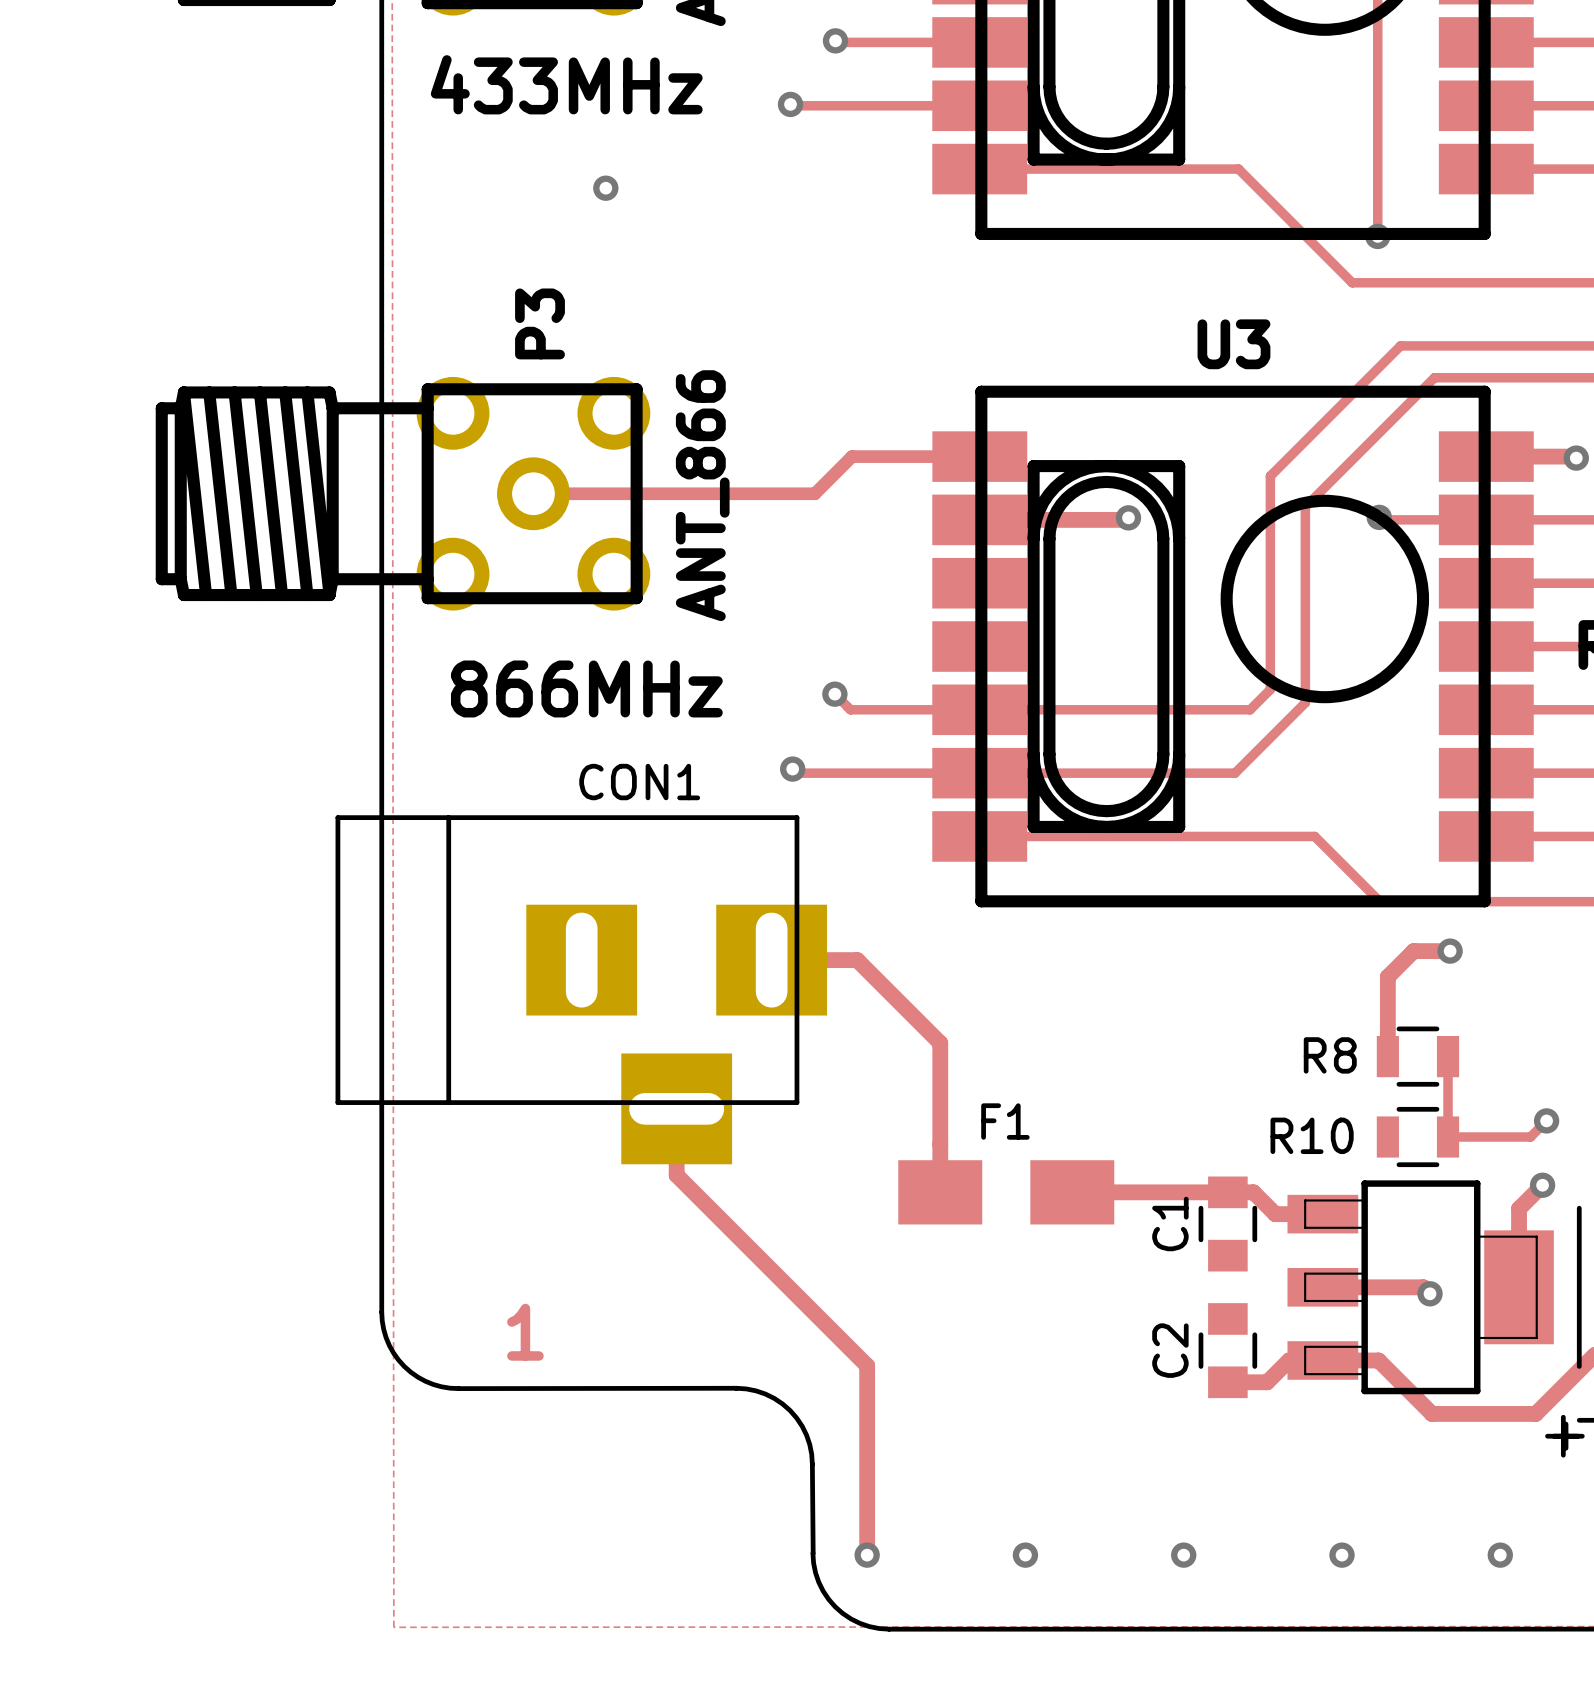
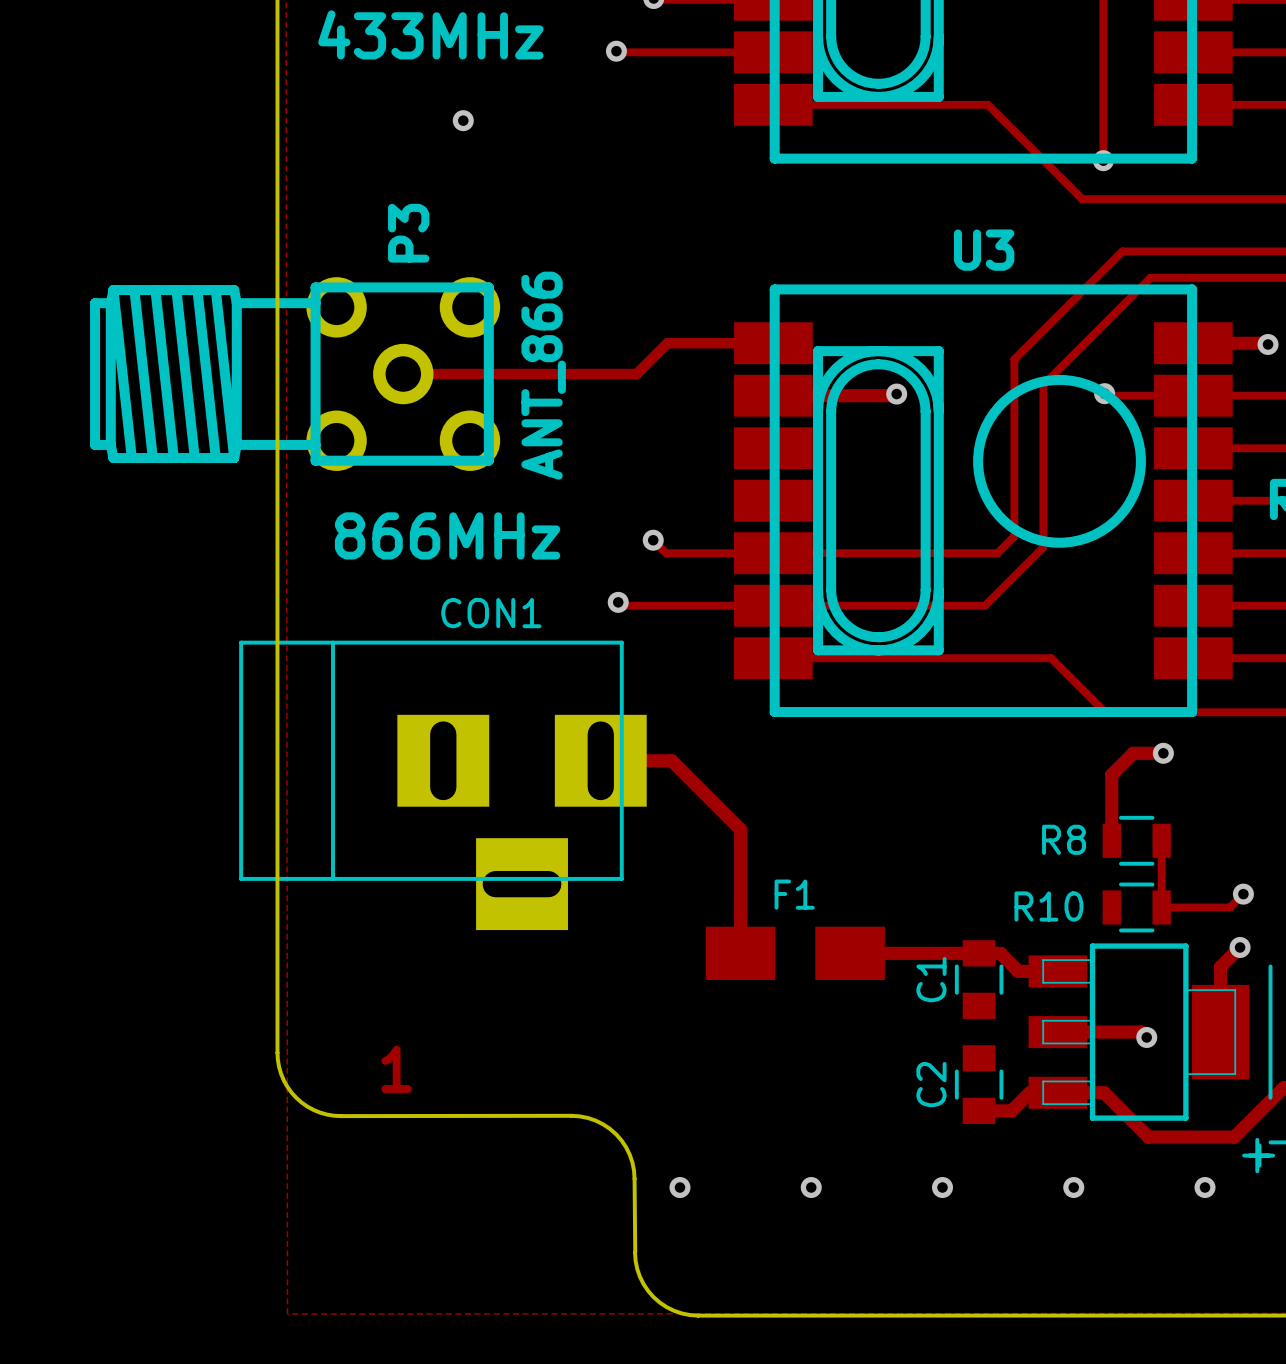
track: (676, 1108) (676, 1175) (867, 1365) (867, 1555) -> none
via position: (867, 1555) -> (679, 1187)
via position: (1025, 1555) -> (811, 1187)
via position: (1183, 1555) -> (942, 1187)
via position: (1342, 1555) -> (1073, 1187)
via position: (1500, 1555) -> (1205, 1187)

